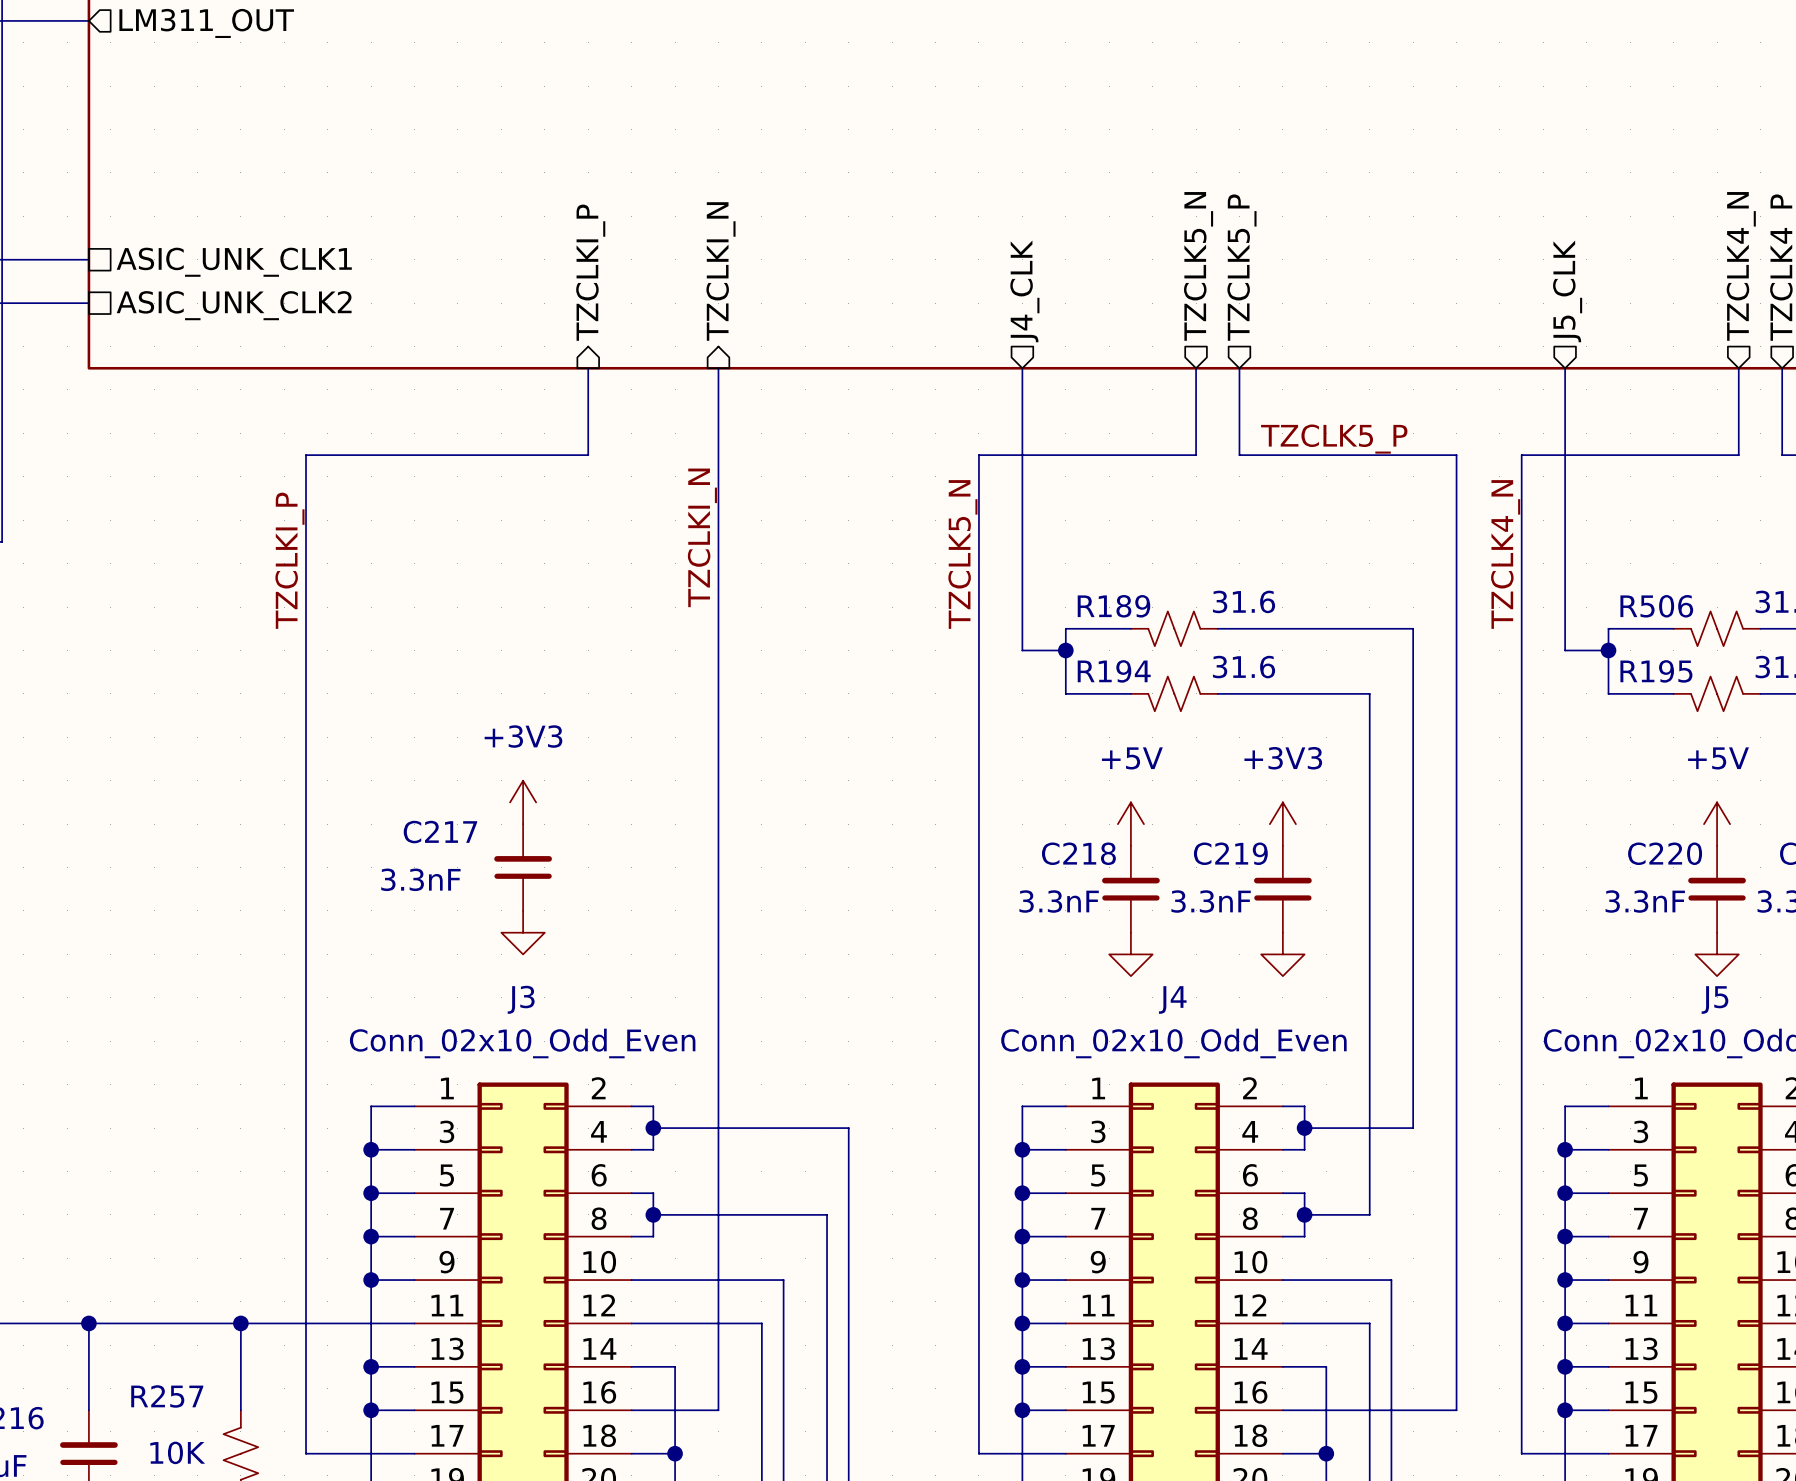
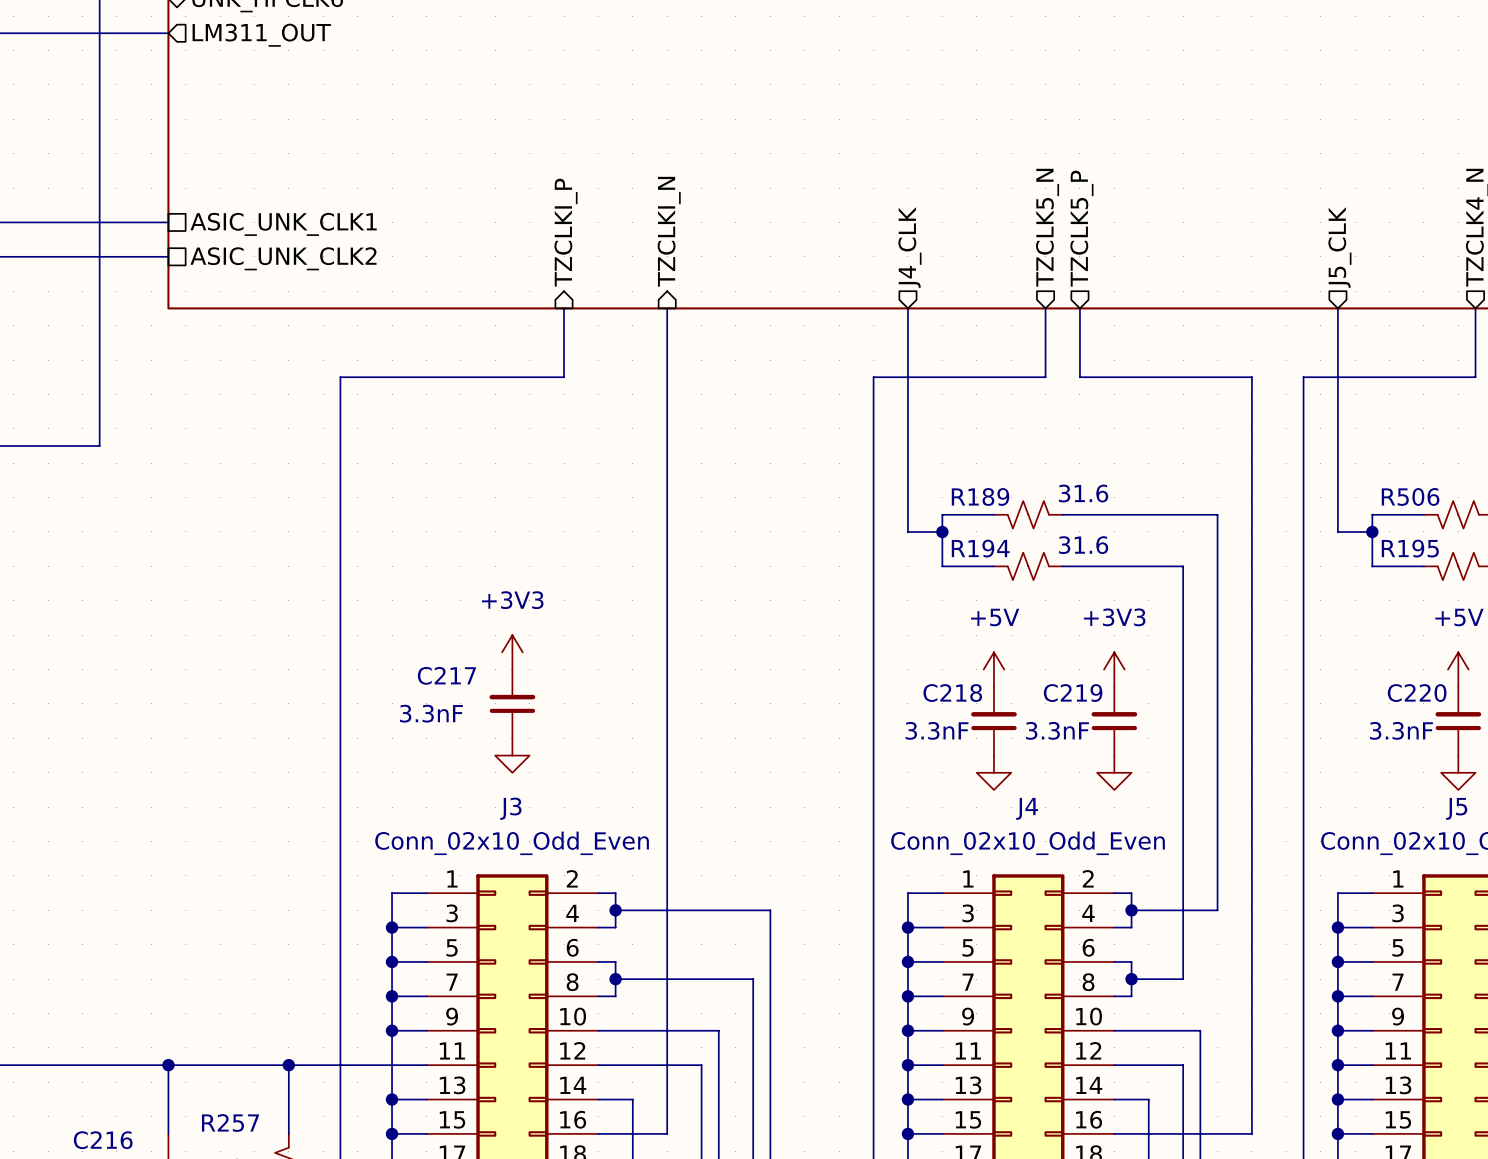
label: TZCLK5_P (1334, 439) -> none
label: TZCLKI_N (702, 537) -> none
label: TZCLK5_N (962, 554) -> none
label: TZCLK4_N (1505, 554) -> none
label: TZCLKI_P (289, 560) -> none

